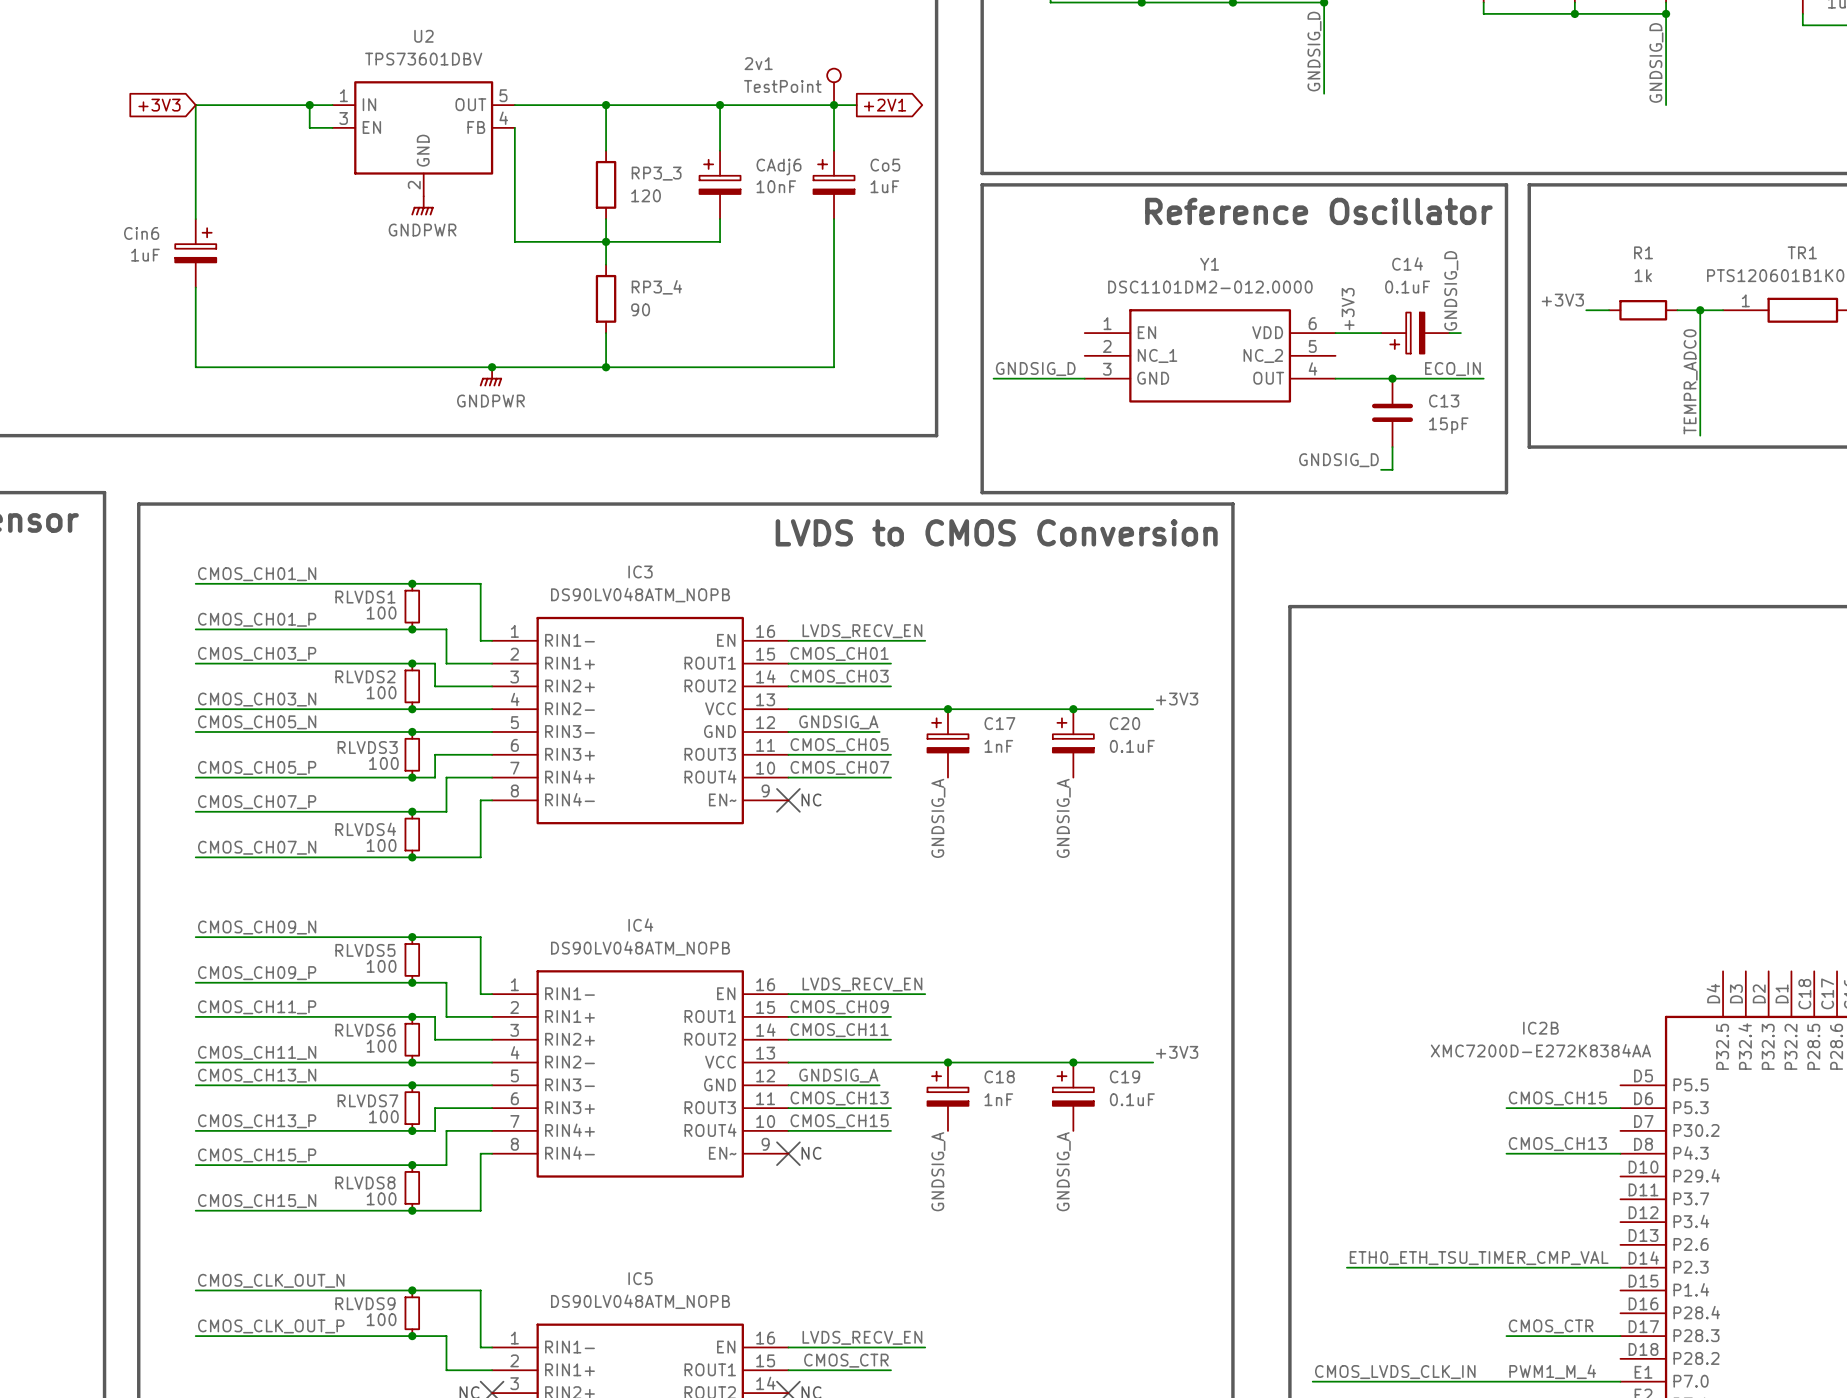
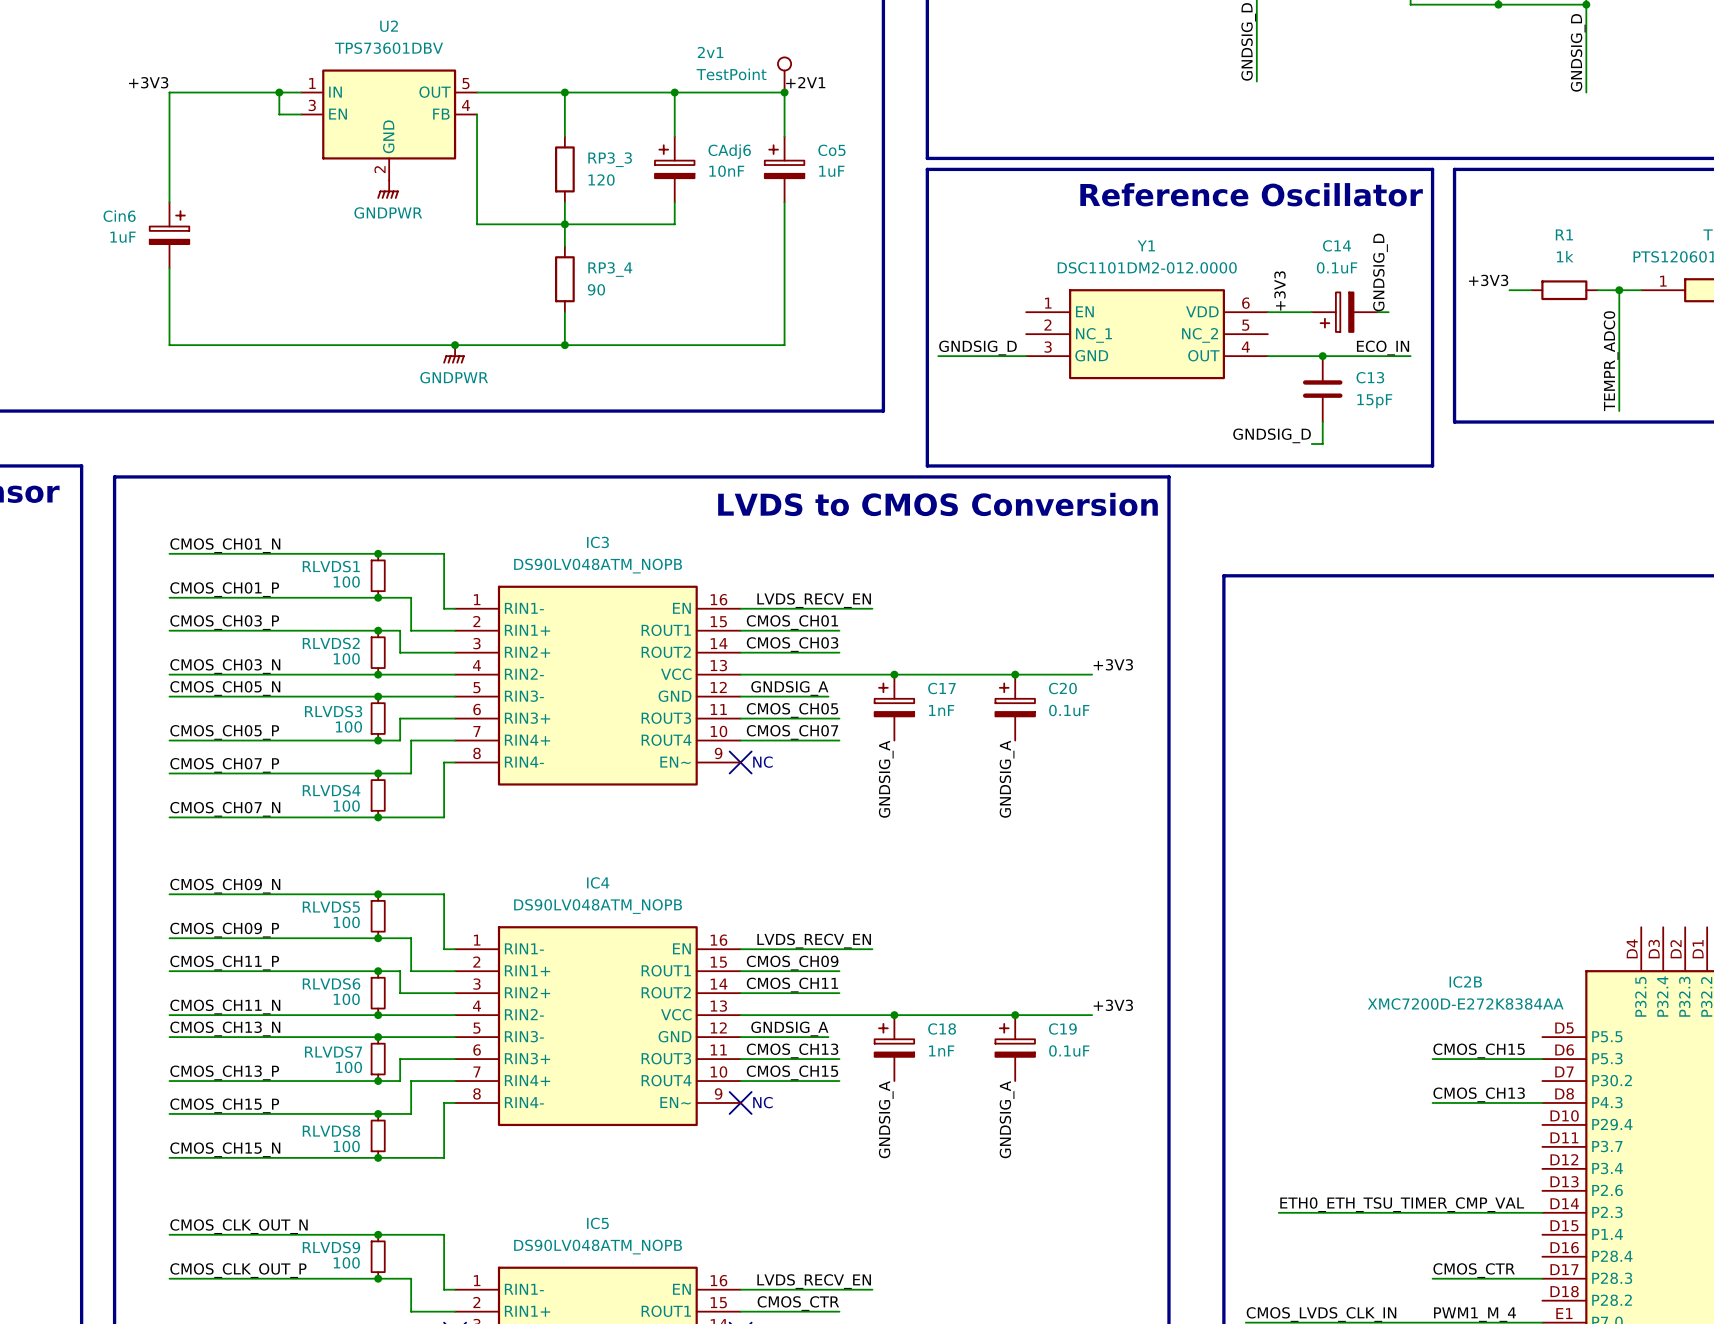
label: none -> +3V3 (148, 82)
label: none -> +2V1 (805, 82)
global label: +3V3 (159, 105) -> none
wire: (834, 105) (856, 105) -> none
global label: +2V1 (885, 105) -> none

